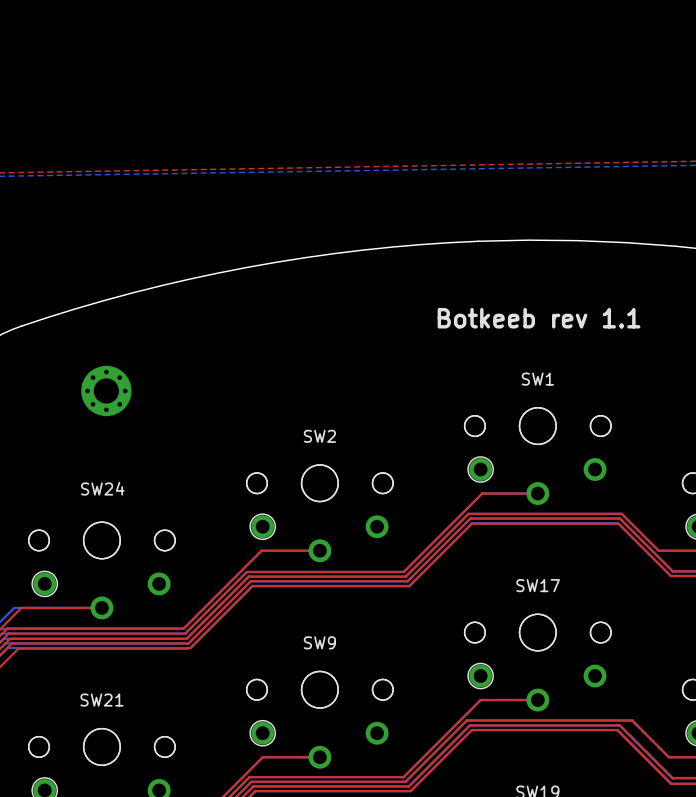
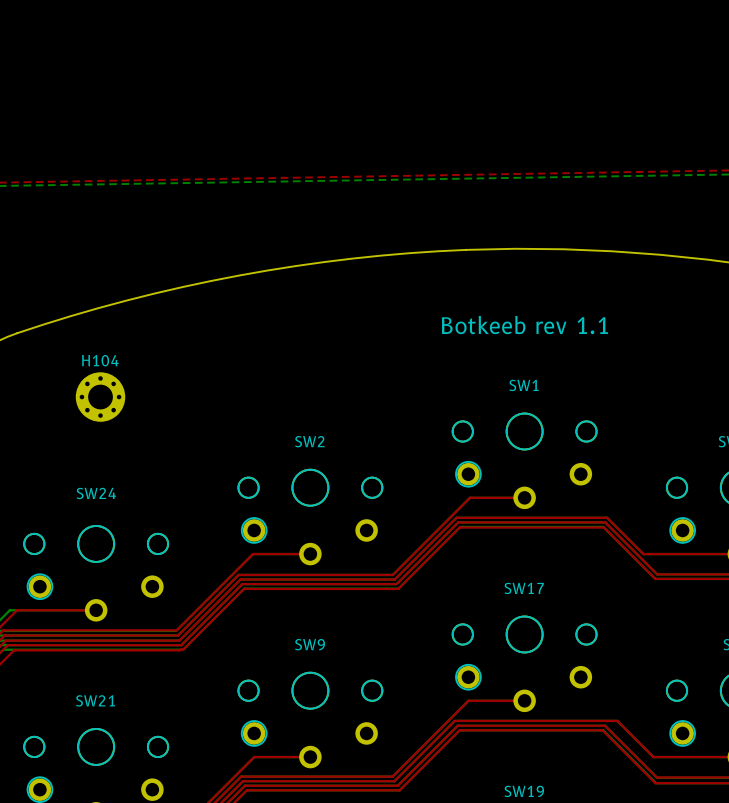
H104 name: none -> H104 (100, 360)

